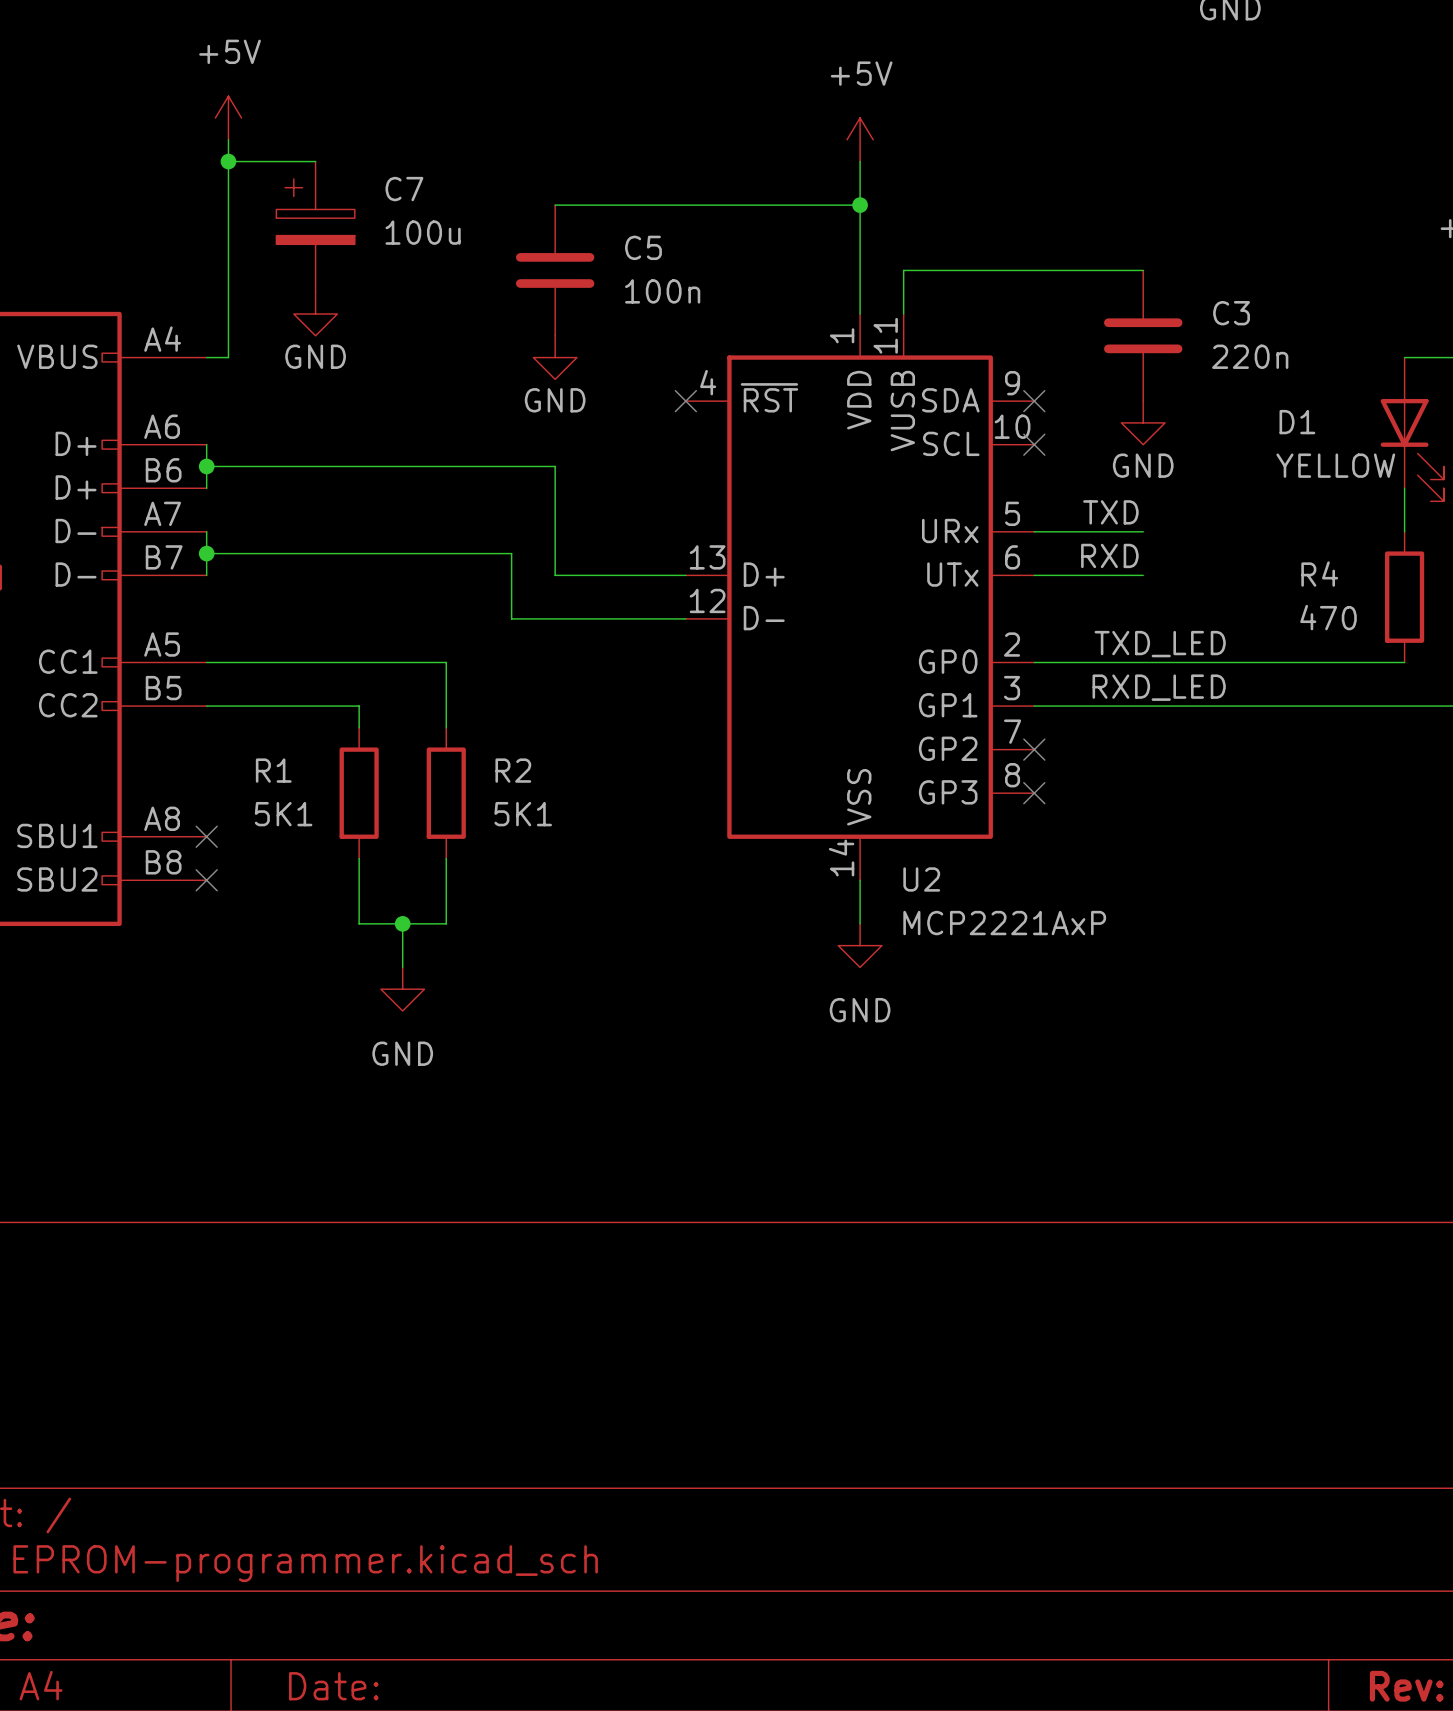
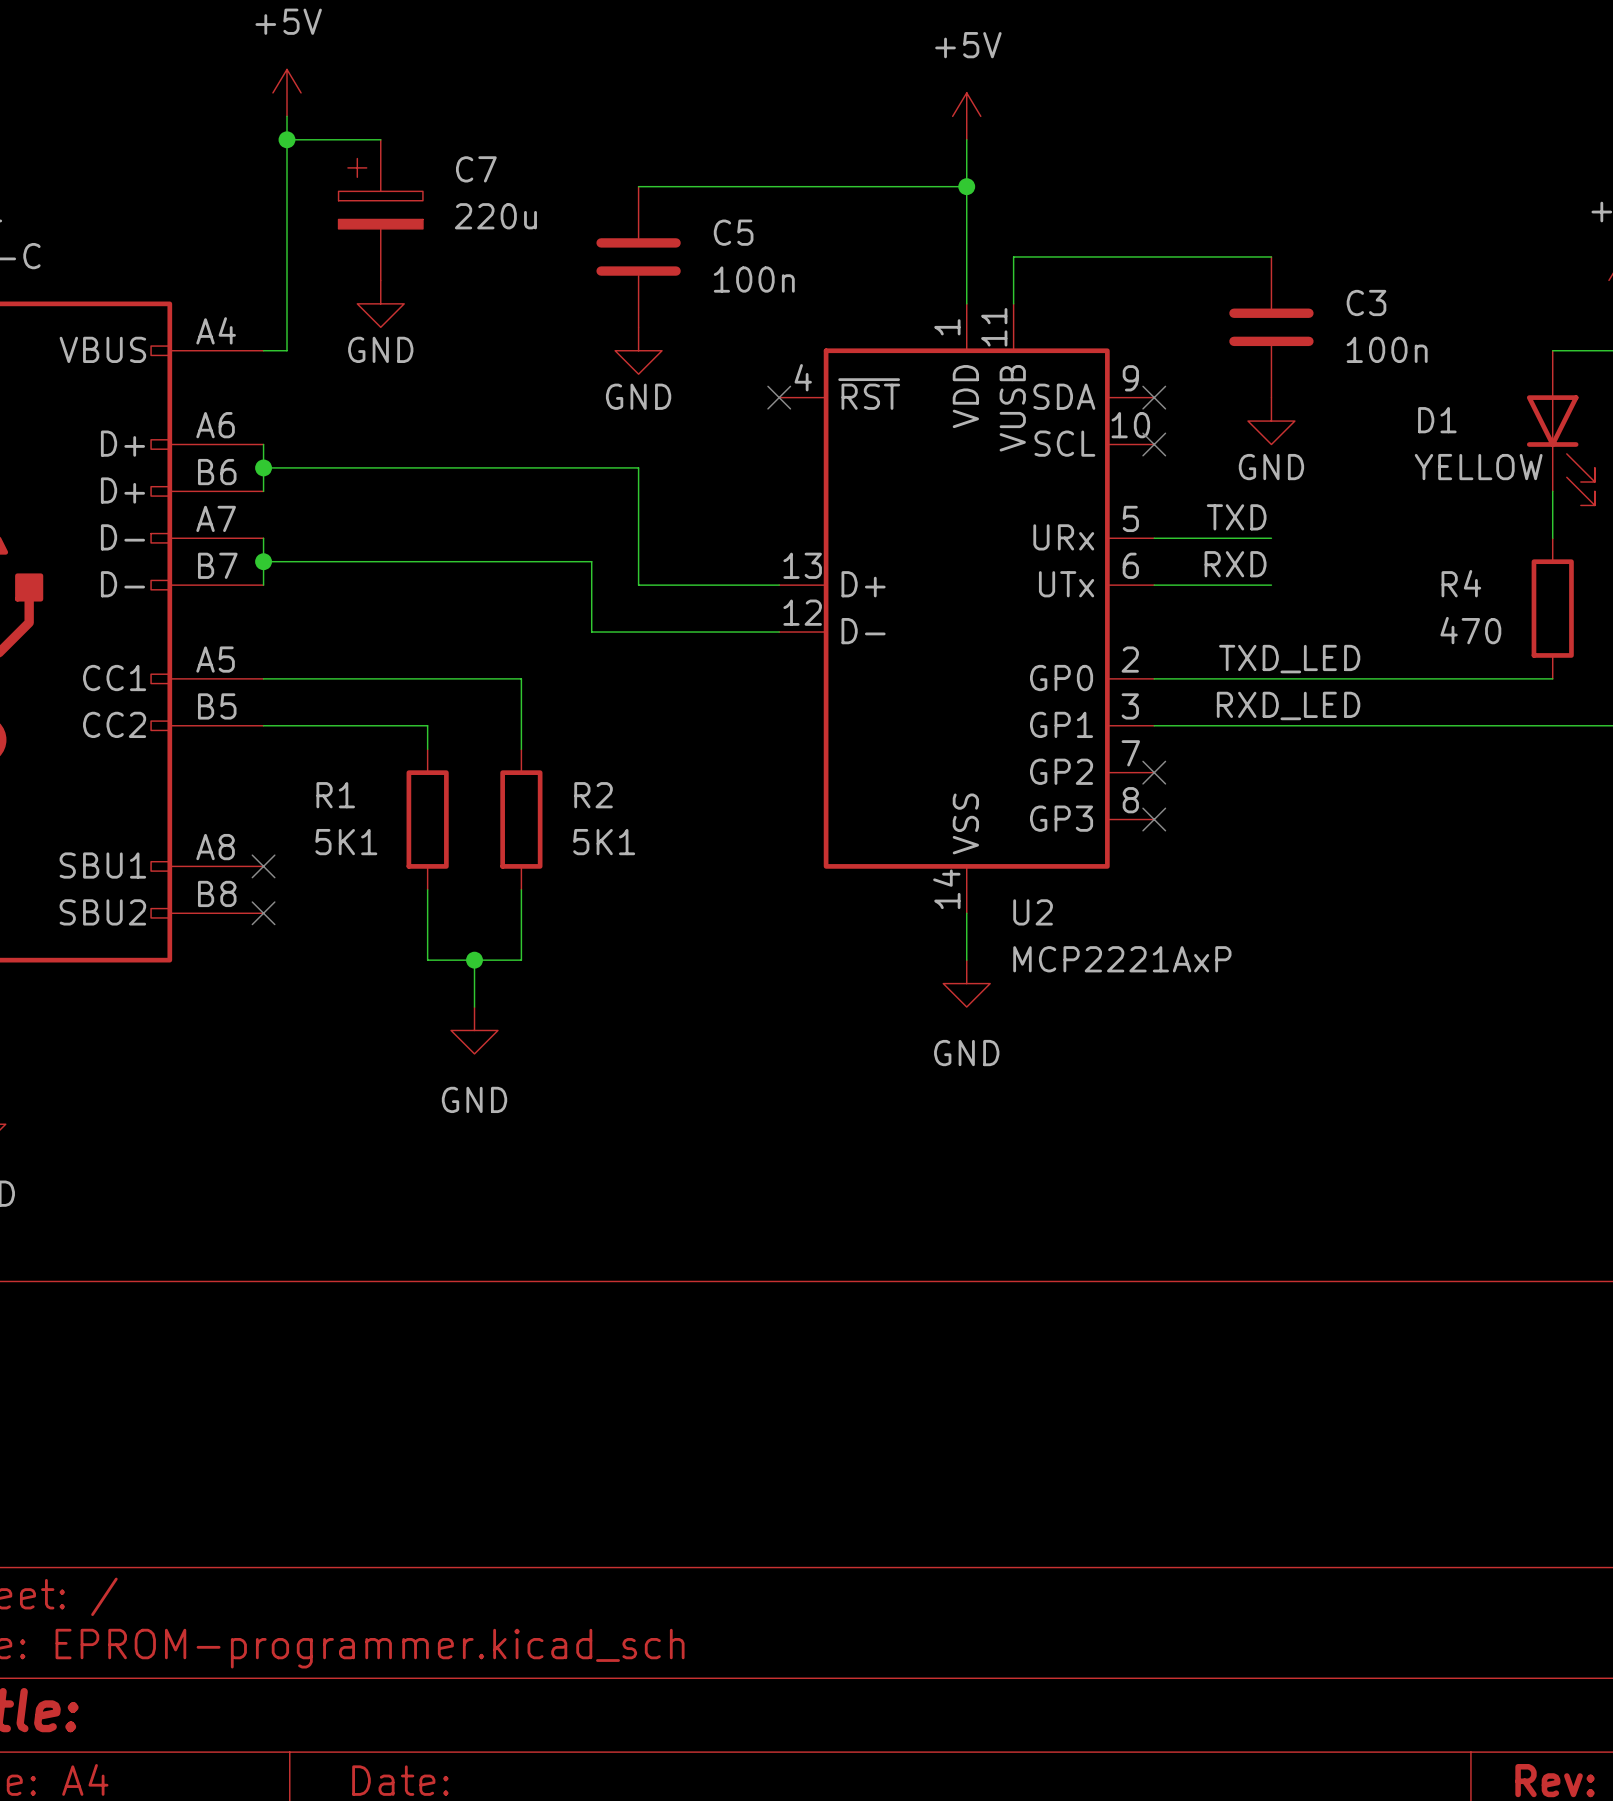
C7 value: 100u (423, 232) -> 220u (495, 216)
C3 value: 220n (1250, 356) -> 100n (1387, 349)

